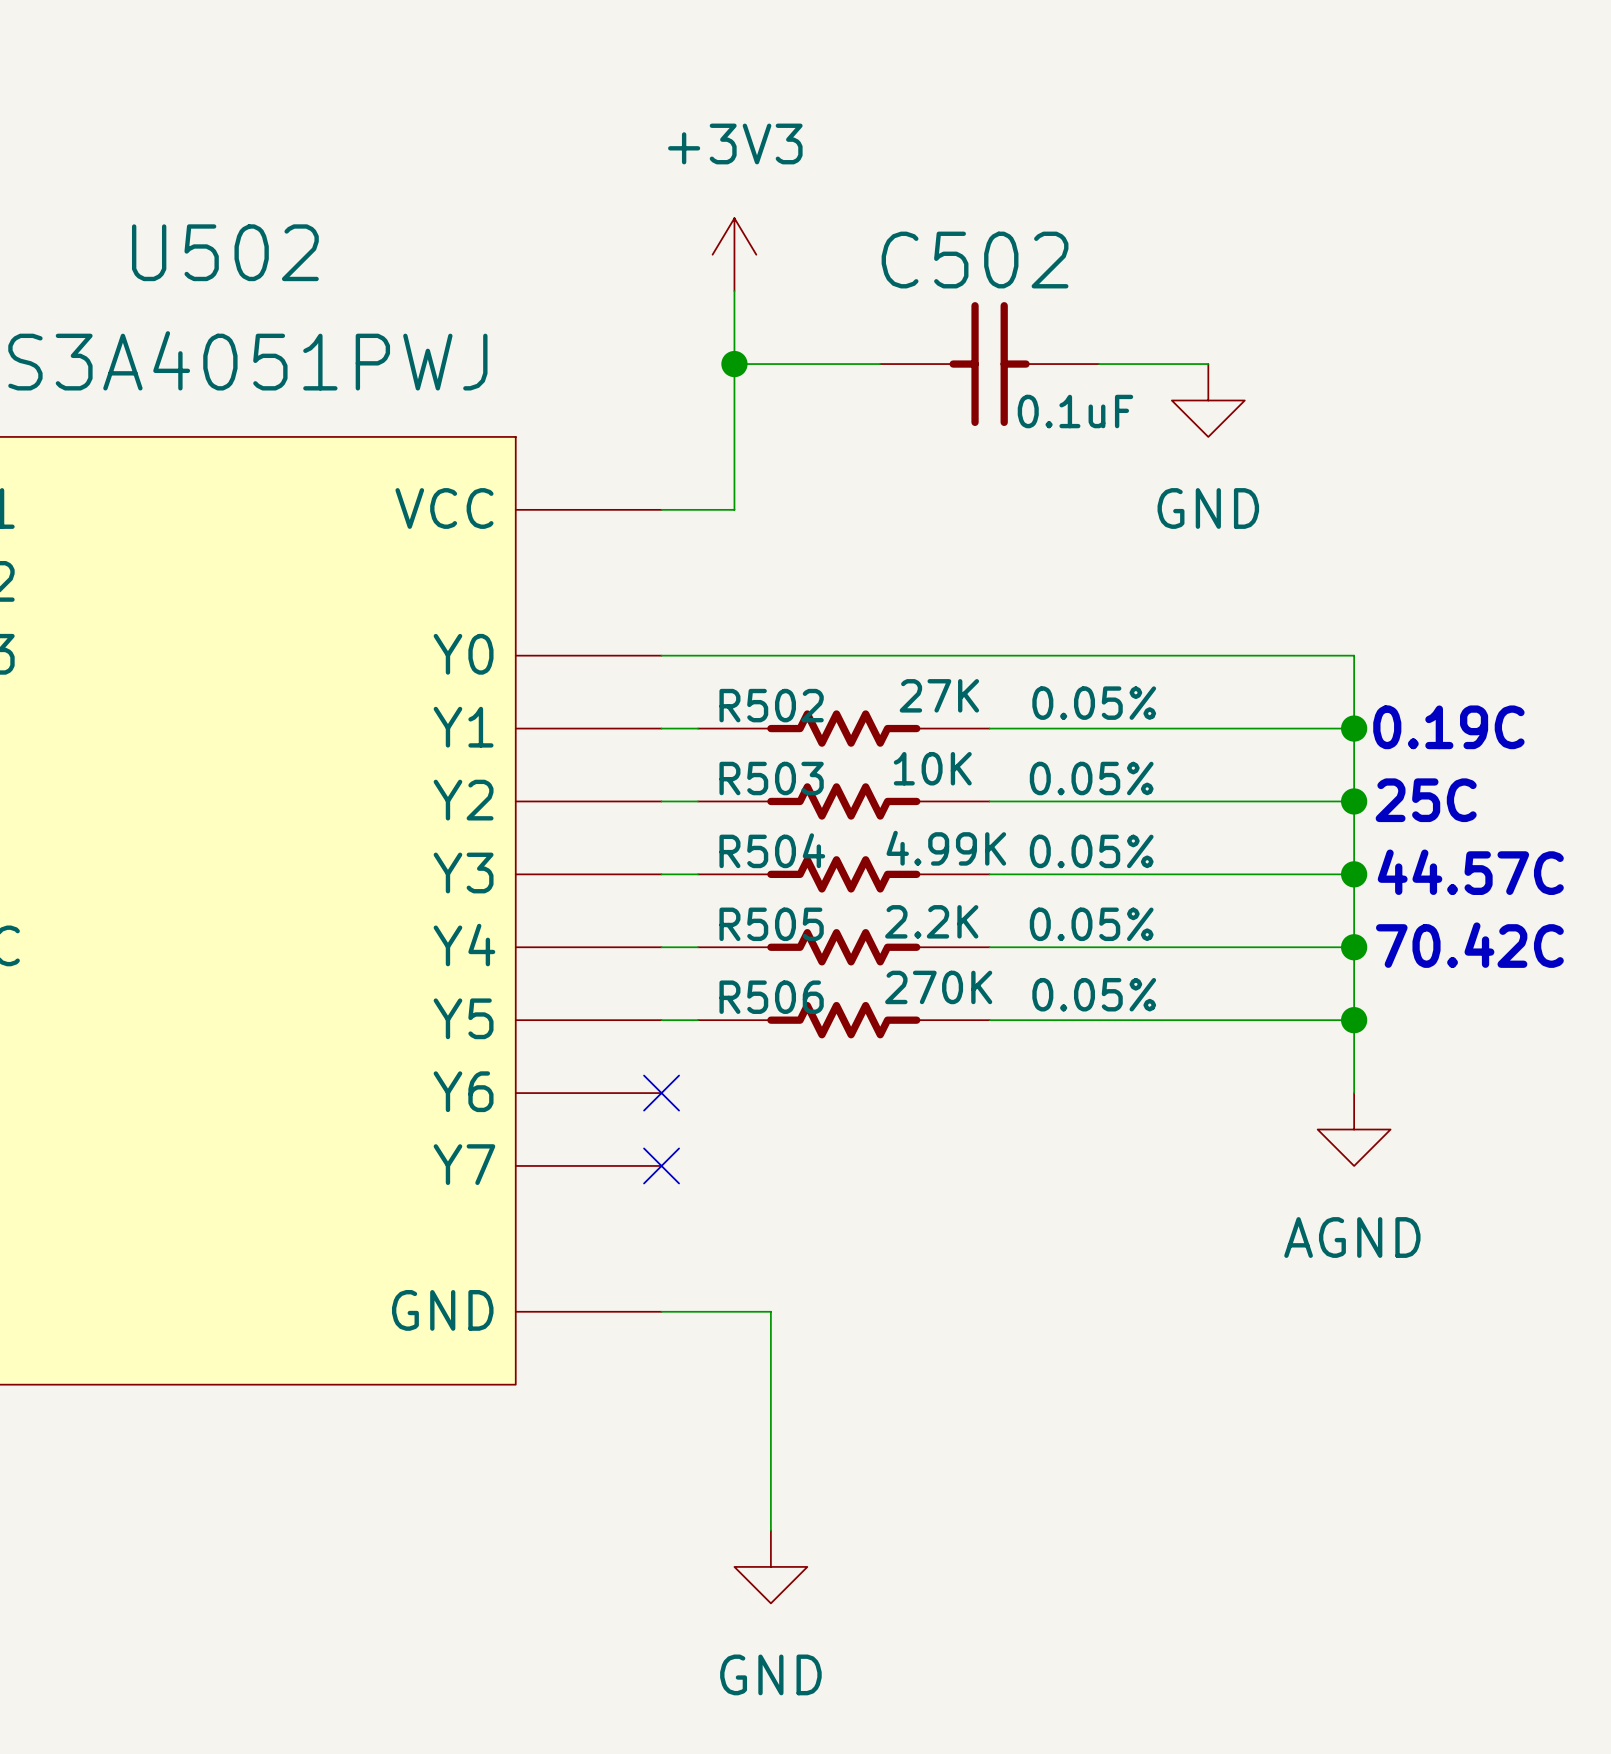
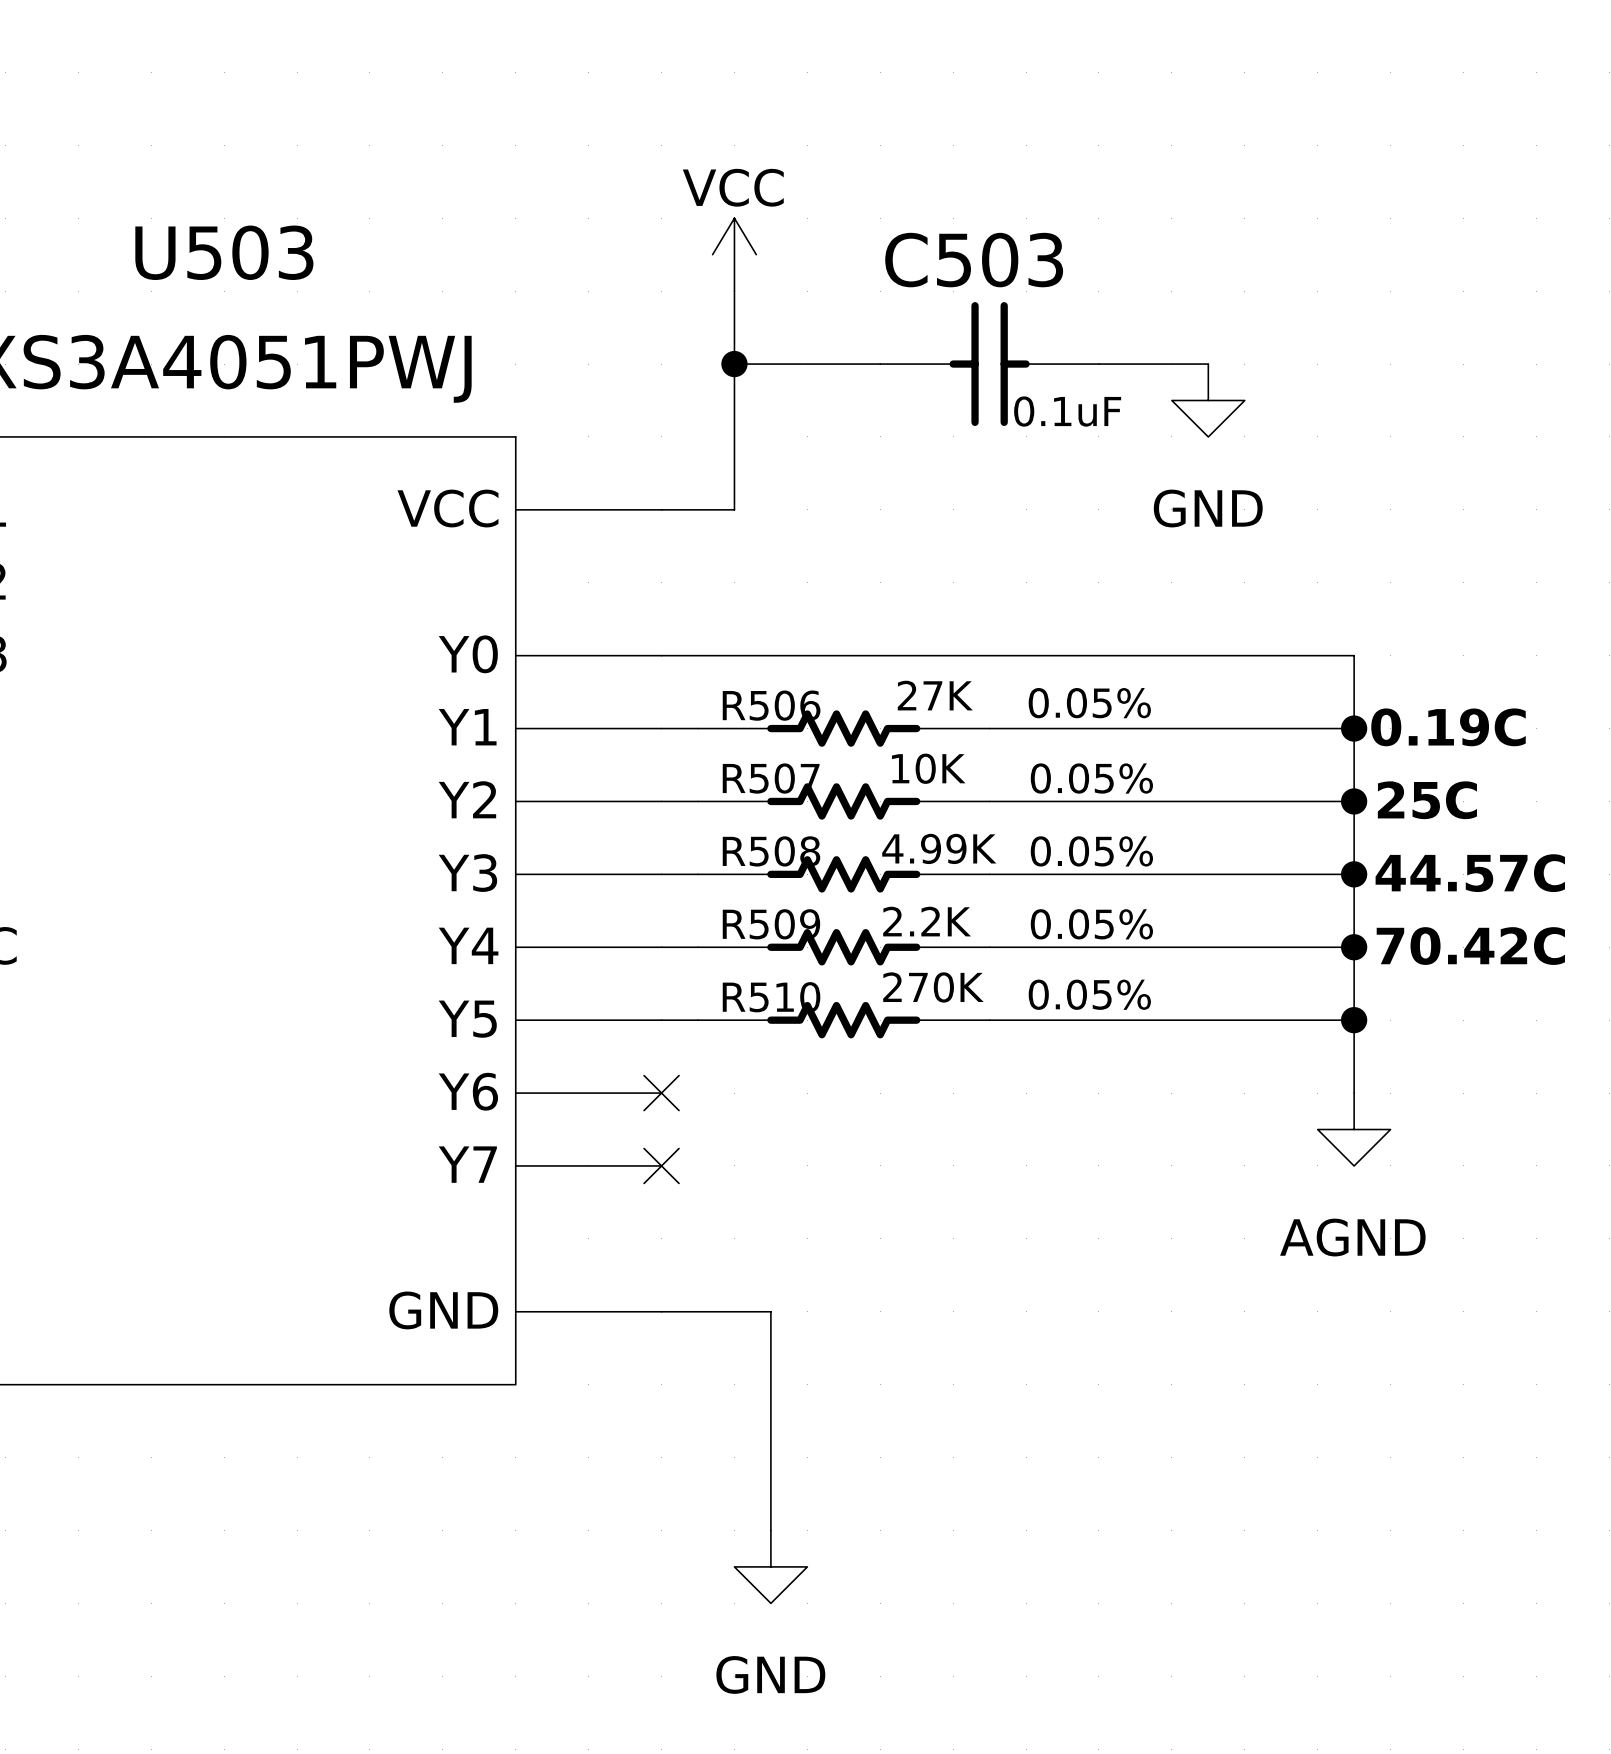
U502 name: U502 (225, 252) -> U503 (224, 252)
power symbol: +3V3 (734, 254) -> VCC (734, 254)
C502 name: C502 (975, 260) -> C503 (974, 260)
R502 name: R502 (771, 705) -> R506 (771, 705)
R503 name: R503 (771, 778) -> R507 (771, 778)
R504 name: R504 (772, 850) -> R508 (771, 851)
R505 name: R505 (771, 924) -> R509 (771, 924)
R506 name: R506 (771, 997) -> R510 (771, 997)

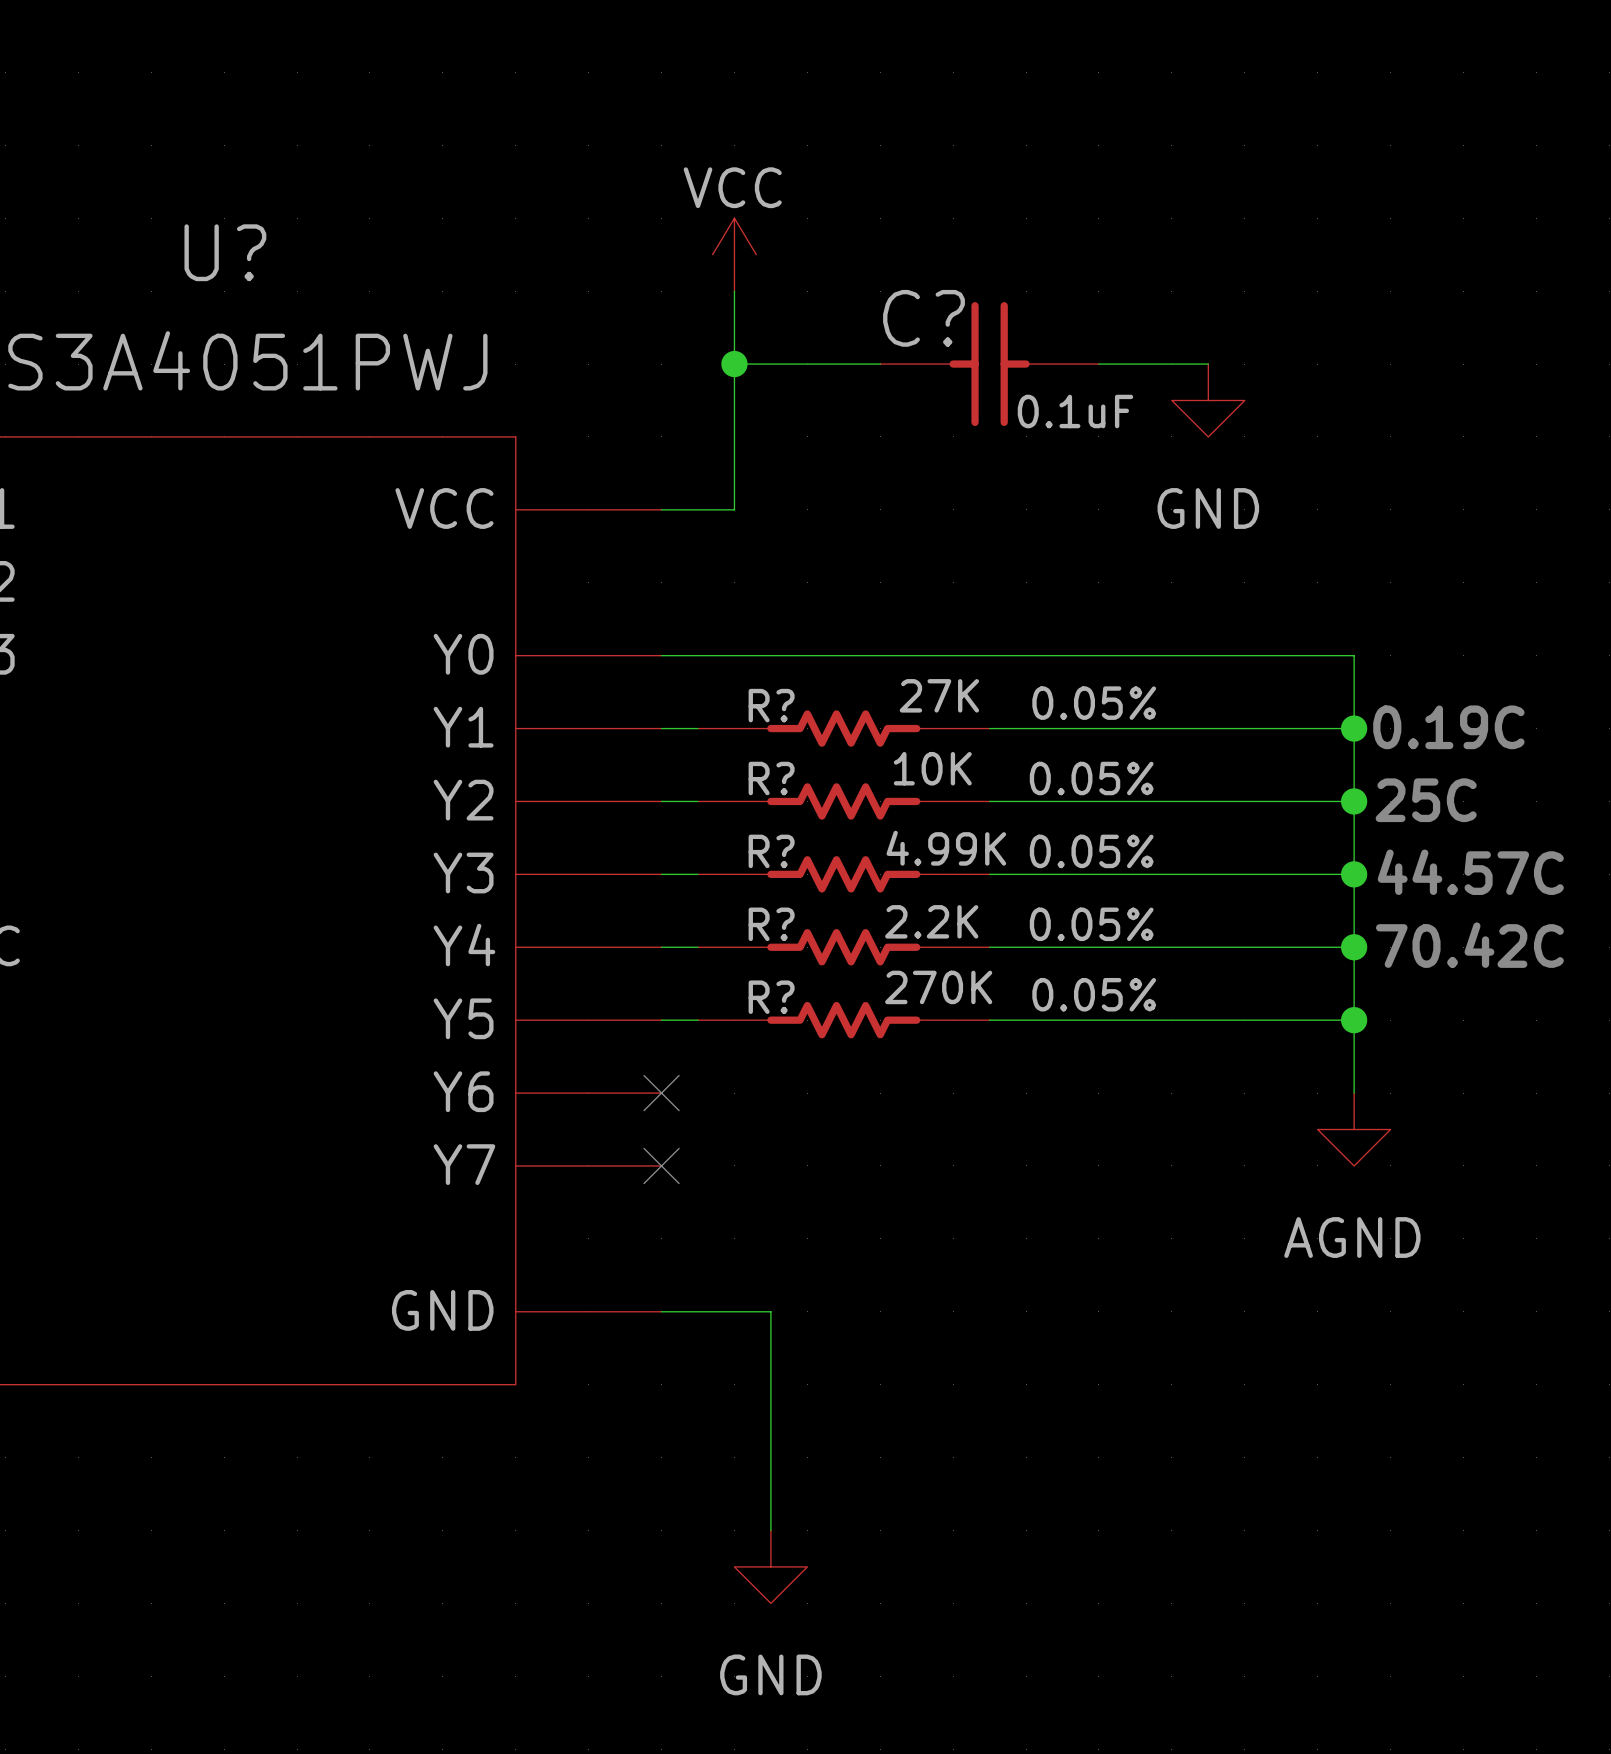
U503 name: U503 (224, 252) -> U? (225, 252)
C503 name: C503 (974, 260) -> C? (924, 318)
R506 name: R506 (771, 705) -> R? (771, 705)
R507 name: R507 (771, 778) -> R? (771, 778)
R508 name: R508 (771, 851) -> R? (771, 851)
R509 name: R509 (771, 924) -> R? (771, 924)
R510 name: R510 (771, 997) -> R? (771, 997)

